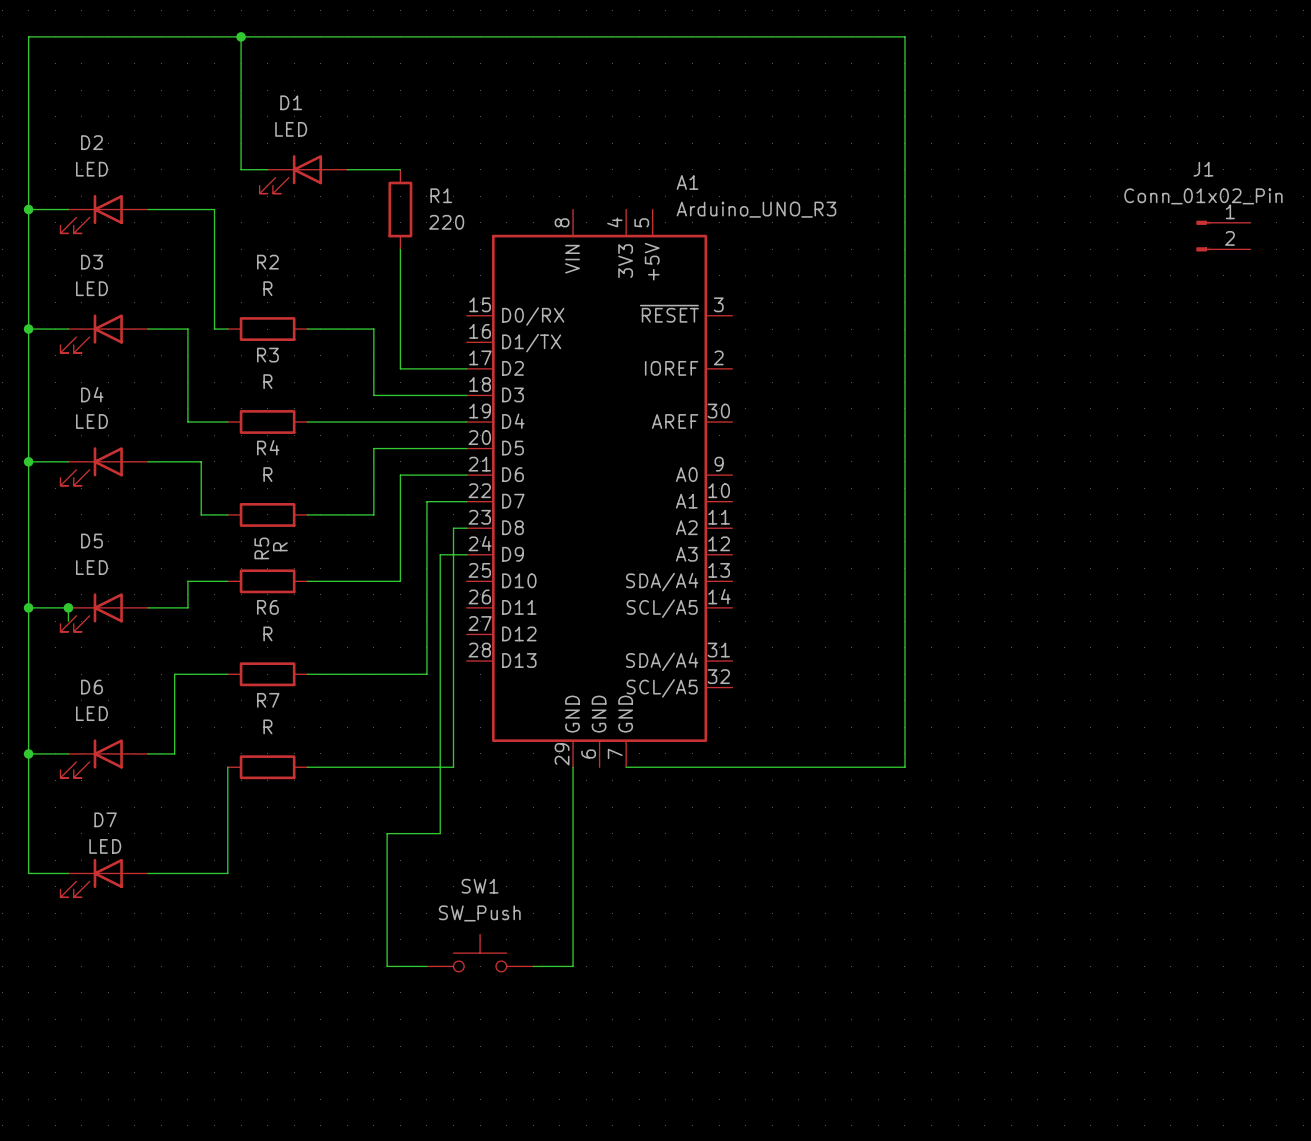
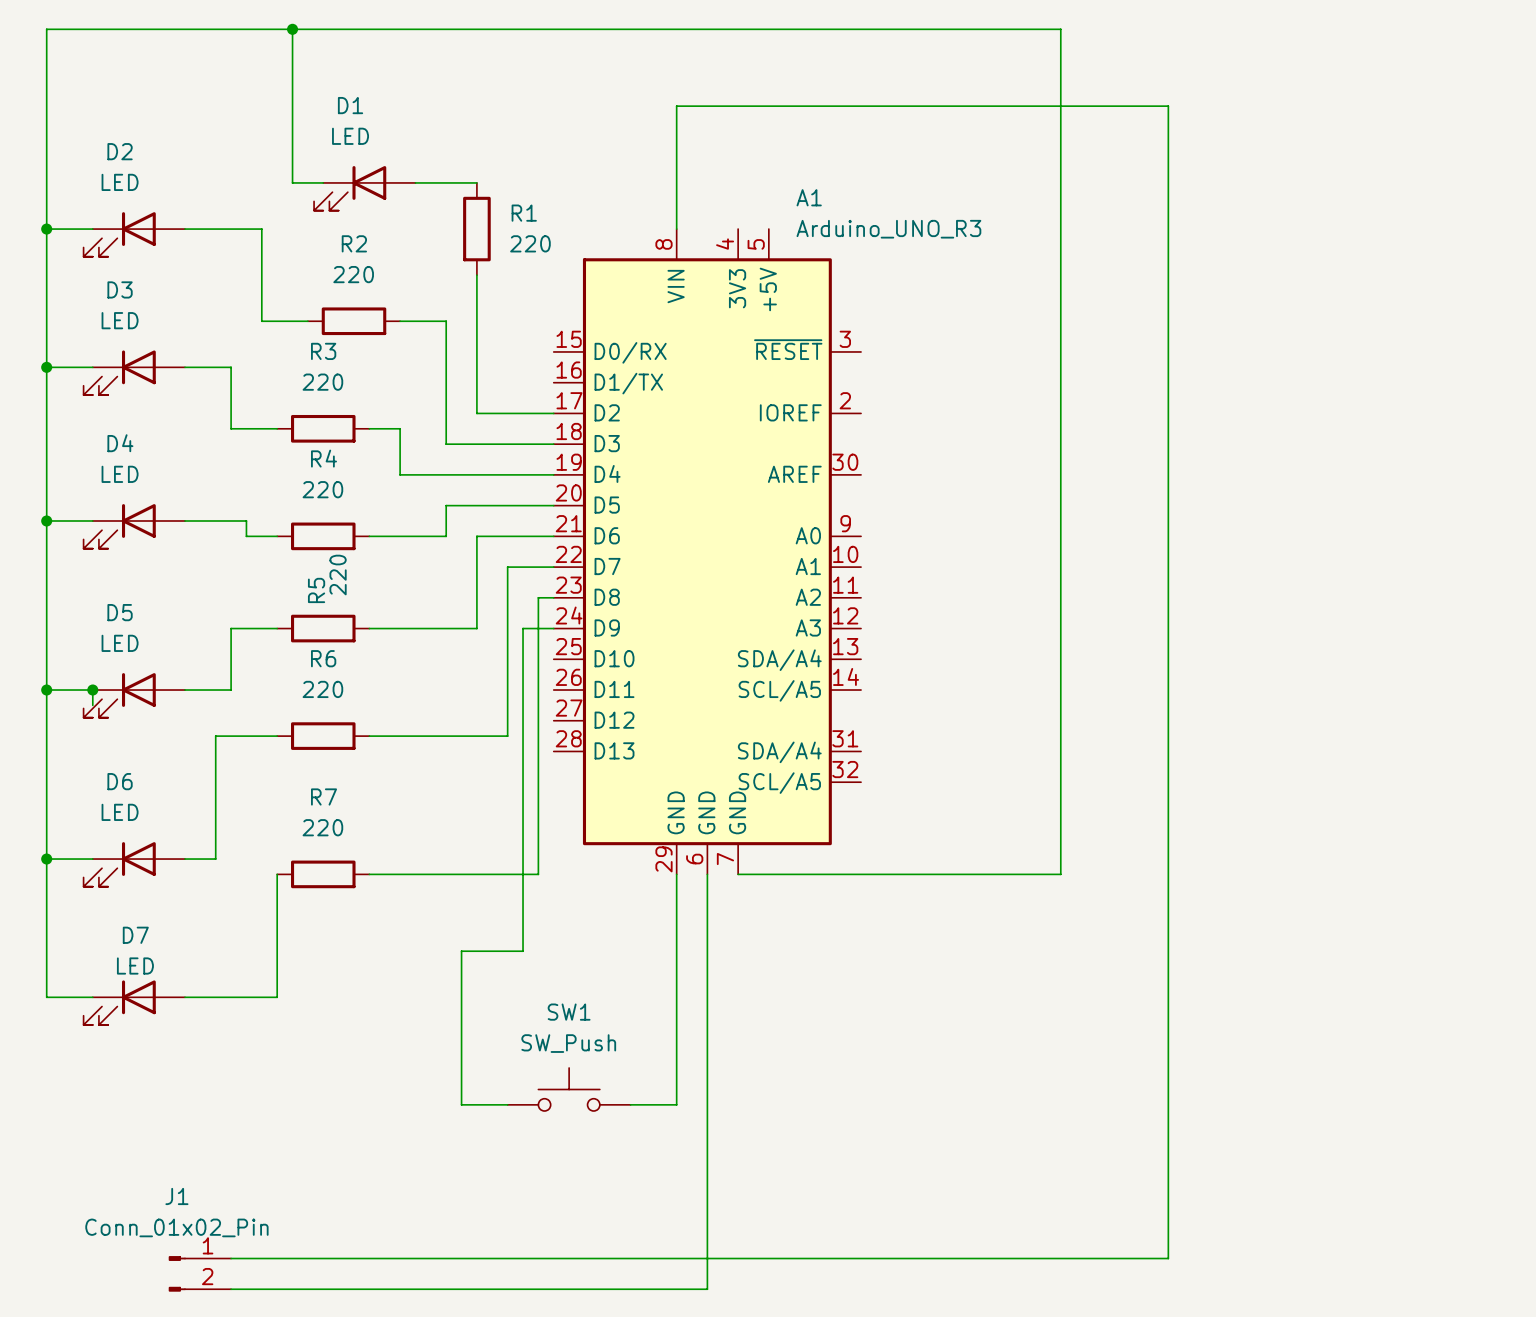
wire: none -> (676, 229) (676, 106) (1168, 106) (1168, 1258) (231, 1258)
J1 position: (1223, 236) -> (199, 1273)
R2 value: R (267, 288) -> 220 (353, 274)
wire: (214, 289) (214, 329) (227, 329) -> (261, 321) (307, 321)
R2 position: (267, 329) -> (354, 321)
wire: (307, 329) (373, 329) -> (400, 321) (446, 321) (446, 367)
R3 value: R (267, 381) -> 220 (322, 382)
wire: (187, 382) (187, 421) (227, 421) -> (231, 428) (277, 428)
R3 position: (267, 421) -> (323, 428)
wire: (307, 421) (334, 421) -> (369, 428) (400, 428) (400, 474)
R4 value: R (267, 474) -> 220 (322, 489)
wire: (201, 475) (201, 514) (227, 514) -> (246, 536) (277, 536)
wire: (373, 475) (373, 514) (307, 514) -> (446, 536) (369, 536)
R4 position: (267, 514) -> (323, 536)
R5 value: R (280, 546) -> 220 (338, 575)
wire: (400, 554) (400, 581) (307, 581) -> (476, 628) (369, 628)
wire: (187, 581) (227, 581) -> (231, 659) (231, 628) (277, 628)
R5 position: (267, 581) -> (323, 628)
R6 value: R (267, 633) -> 220 (322, 689)
wire: (426, 647) (426, 674) (307, 674) -> (507, 736) (369, 736)
wire: (174, 674) (227, 674) -> (215, 766) (215, 736) (277, 736)
R6 position: (267, 674) -> (323, 736)
R7 value: R (267, 726) -> 220 (322, 827)
wire: none -> (707, 874) (707, 1289) (231, 1289)

